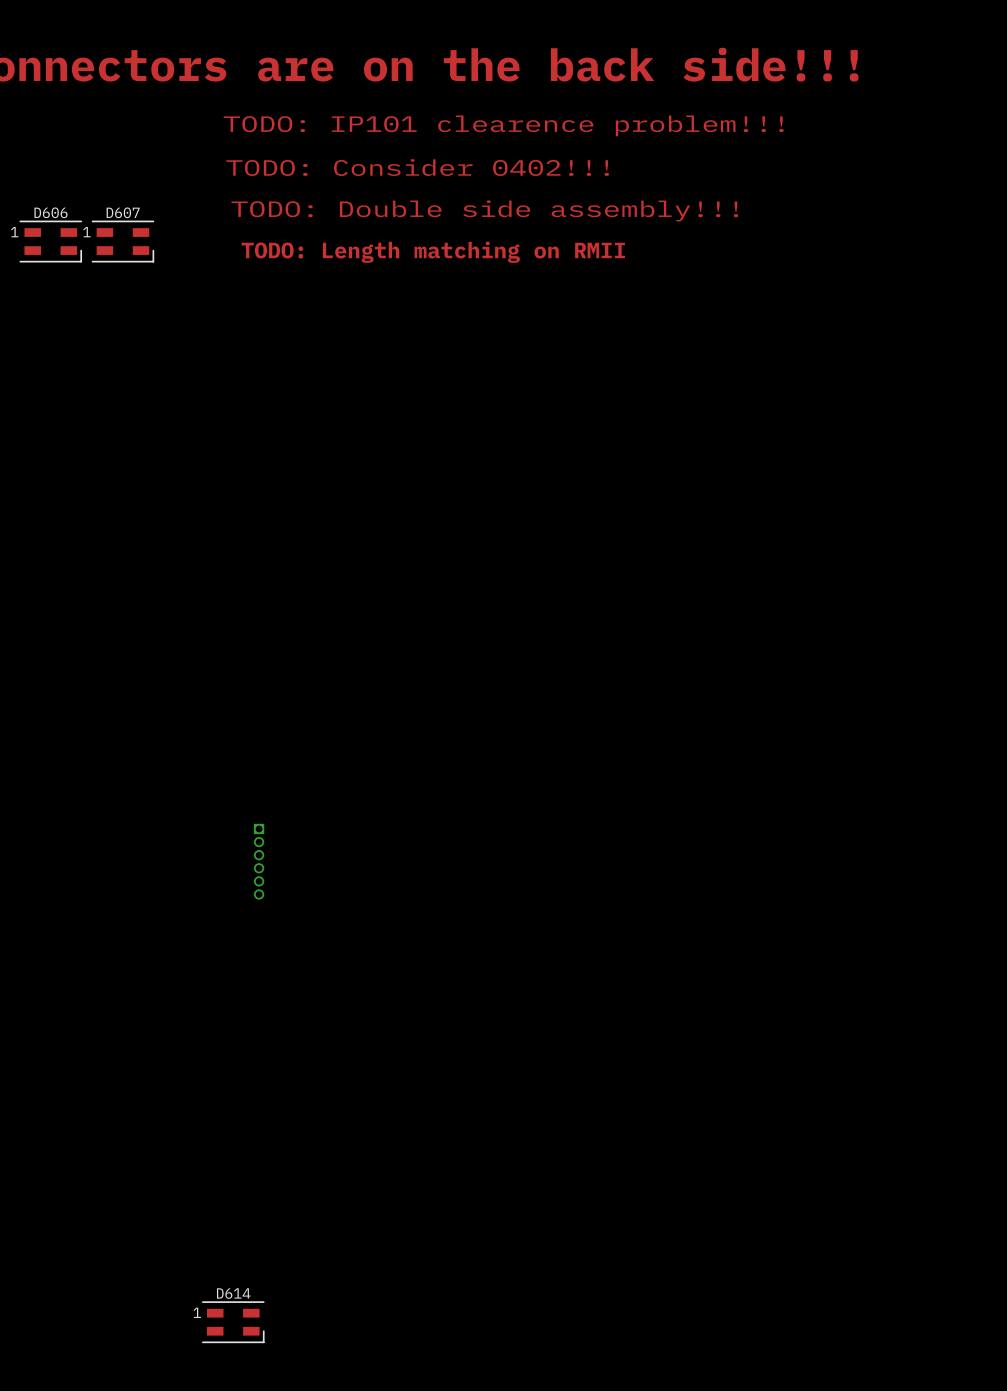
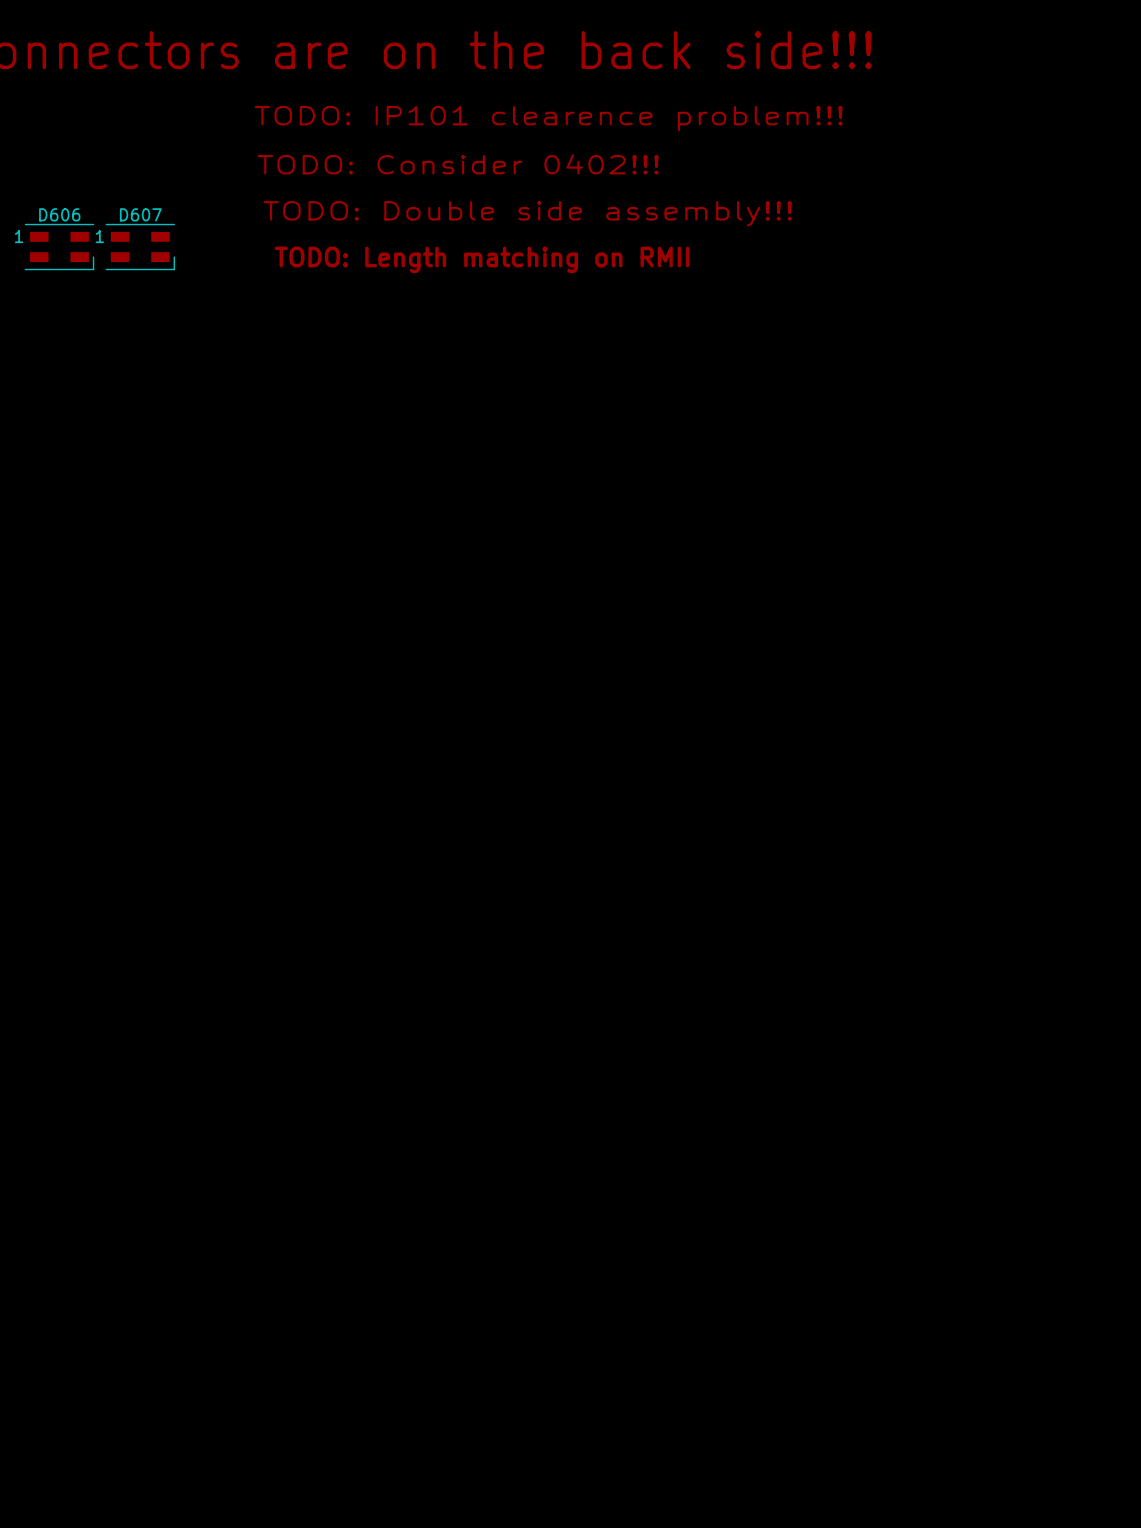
part: (259, 861) -> none
D614: (233, 1322) -> none

